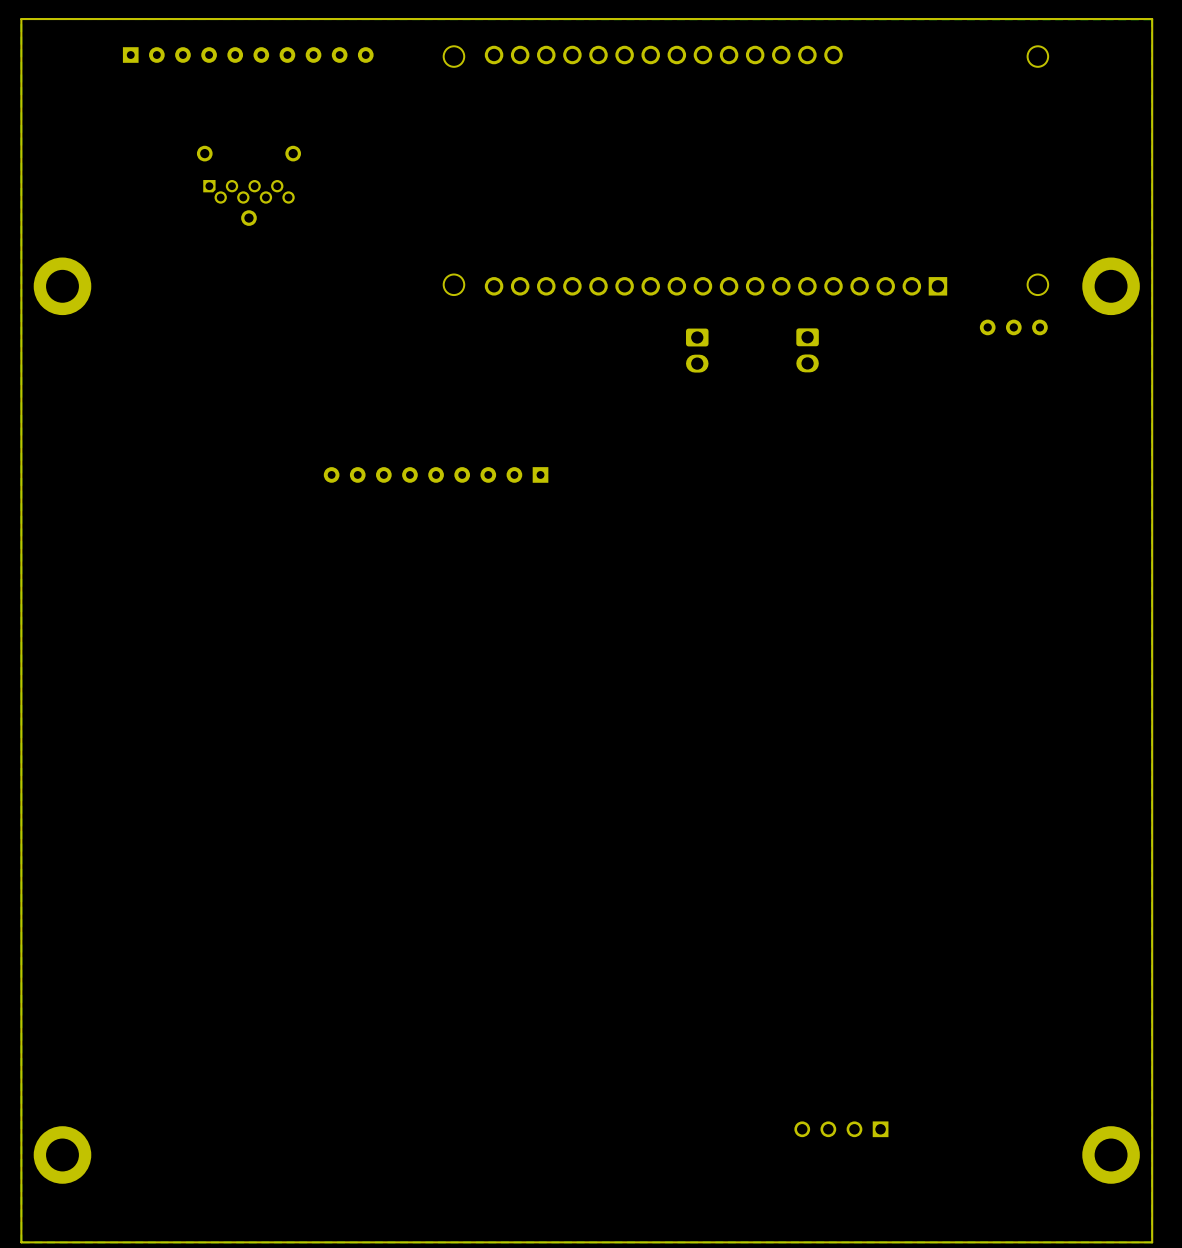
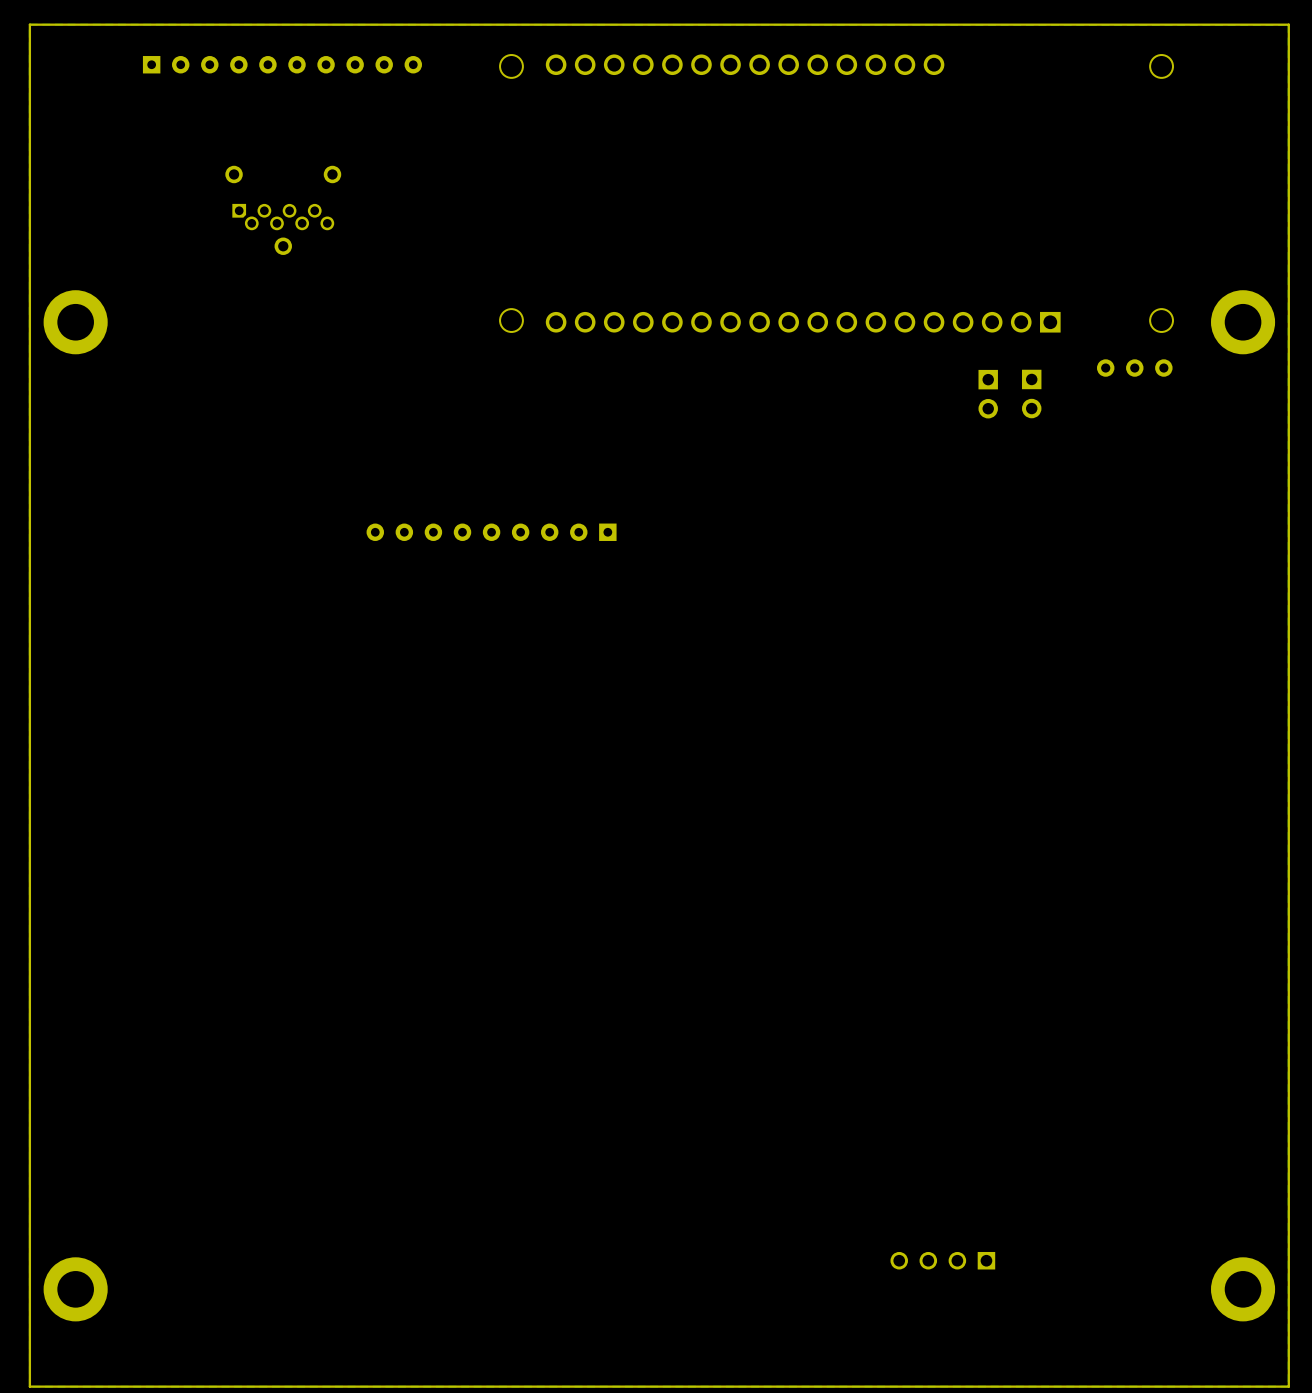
part: (697, 350) -> none
part: (807, 350) -> none
part: none -> (988, 394)
part: none -> (1031, 394)

